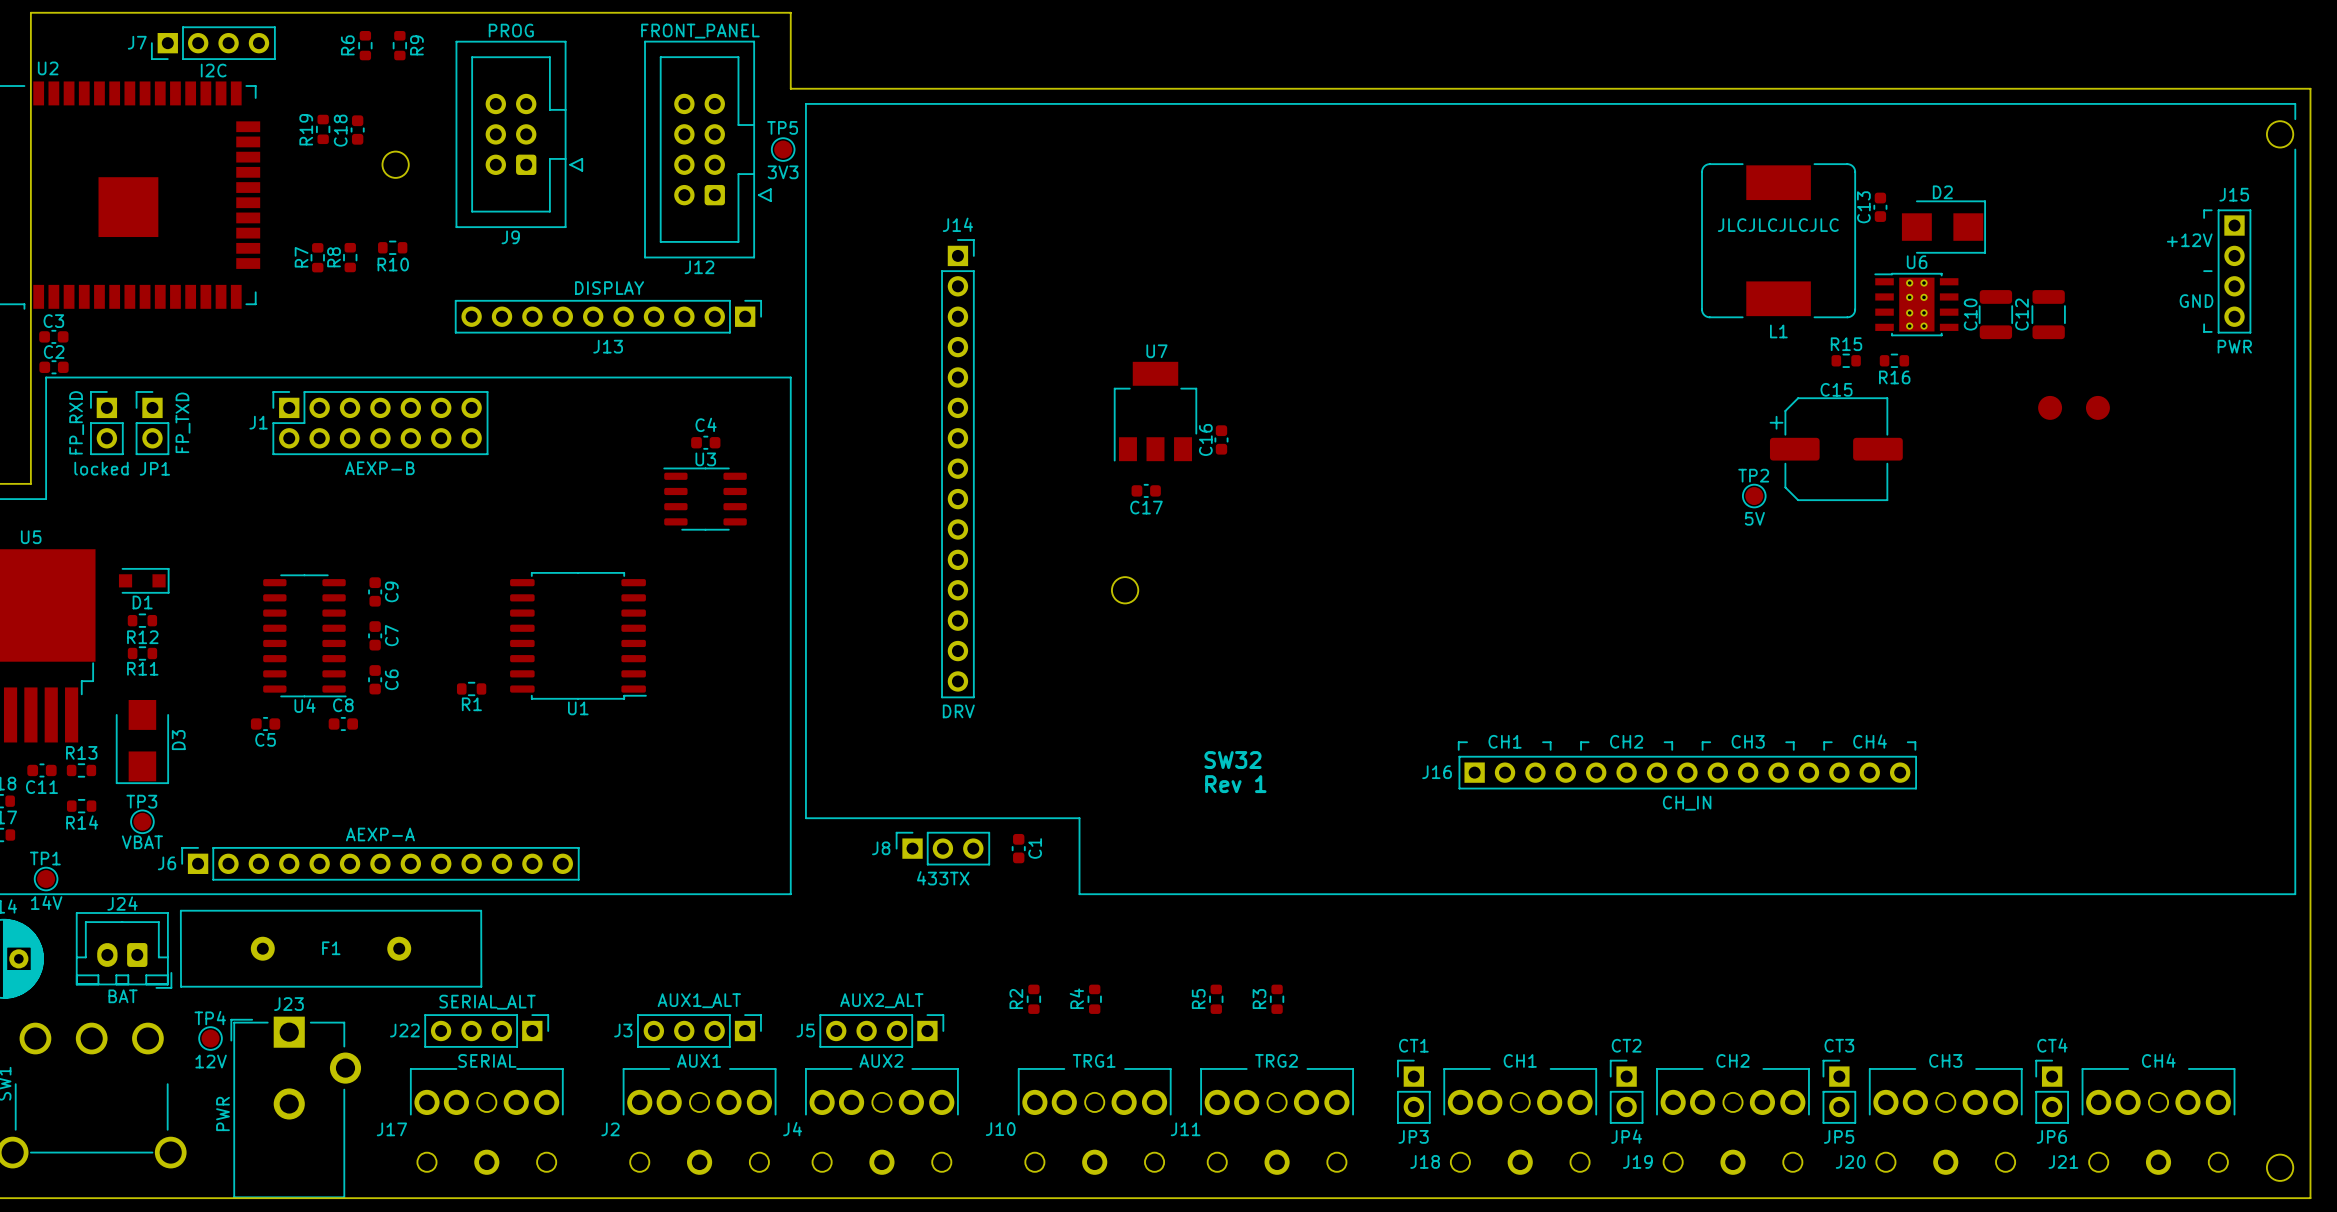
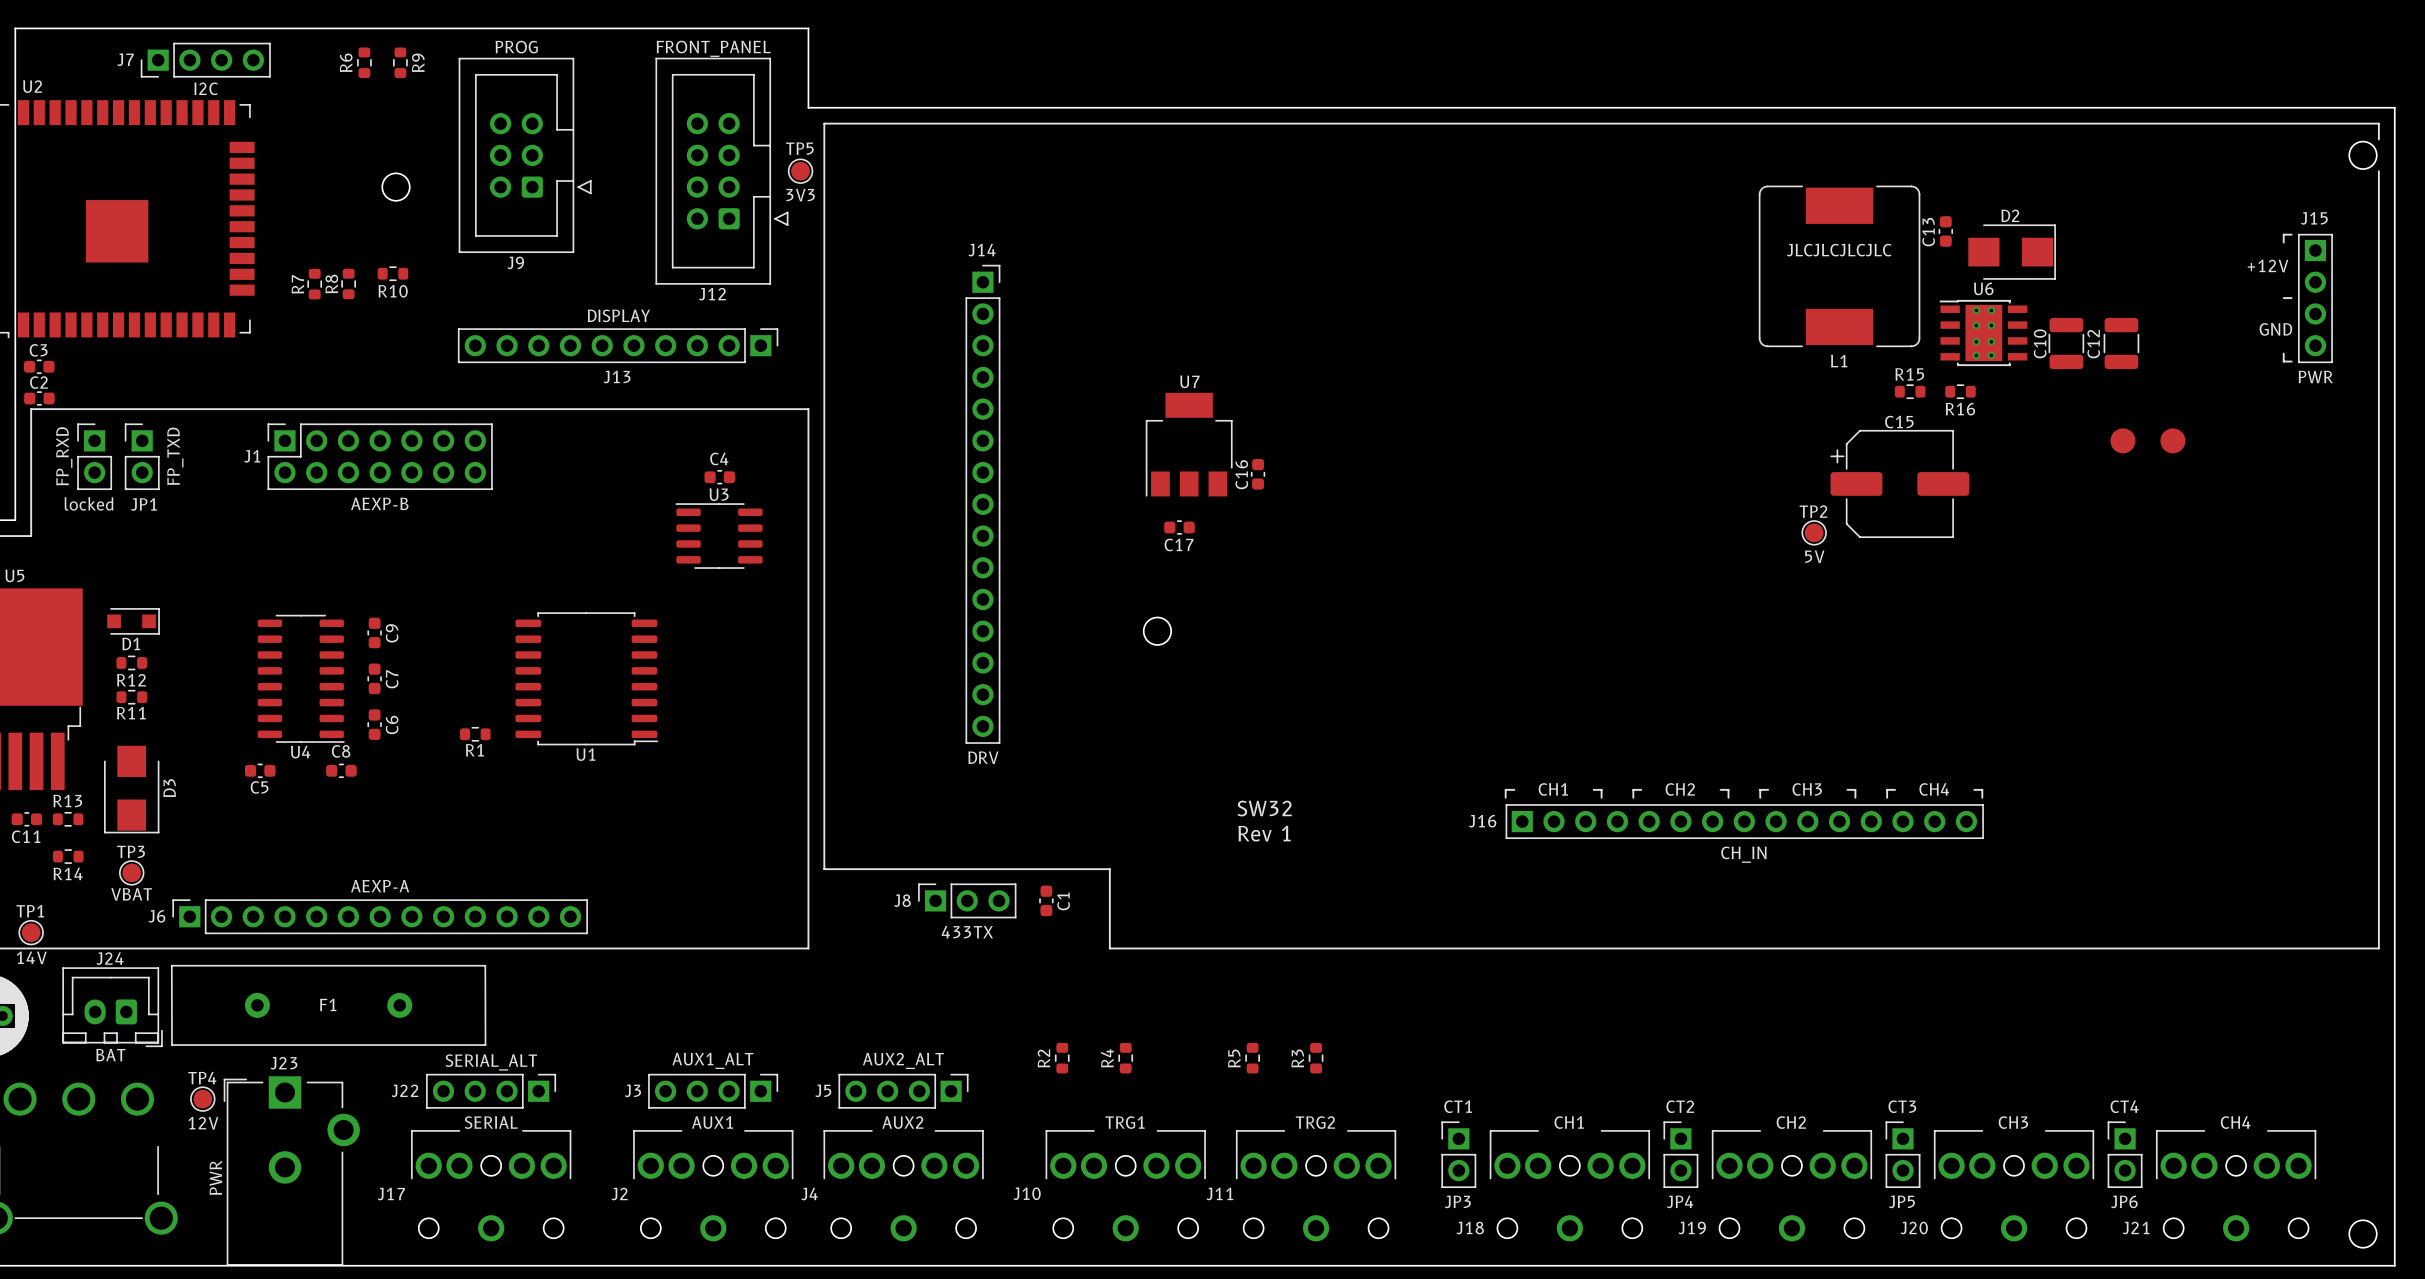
R19: (323, 129) -> none
C18: (357, 130) -> none

